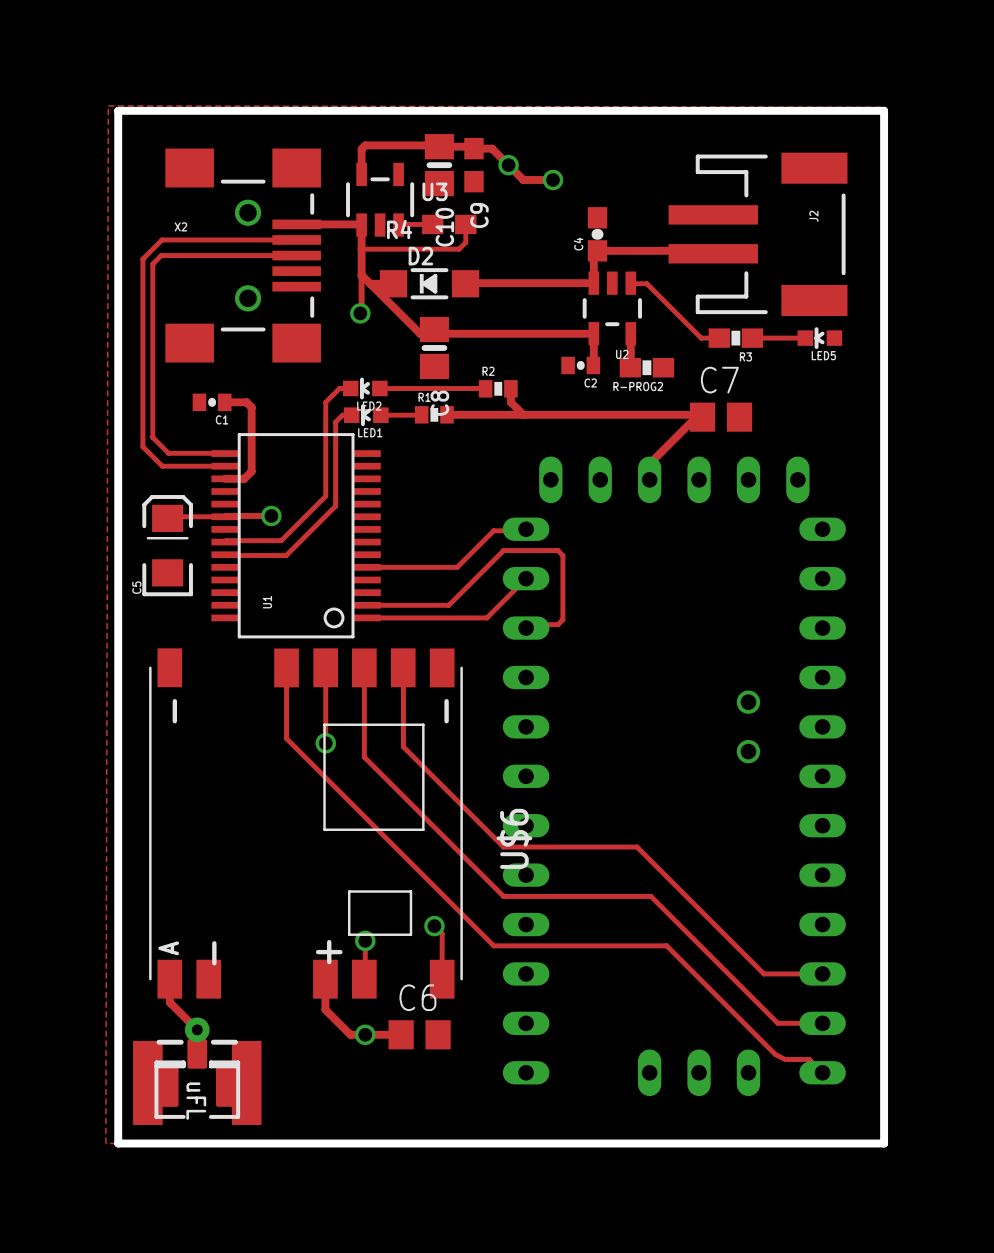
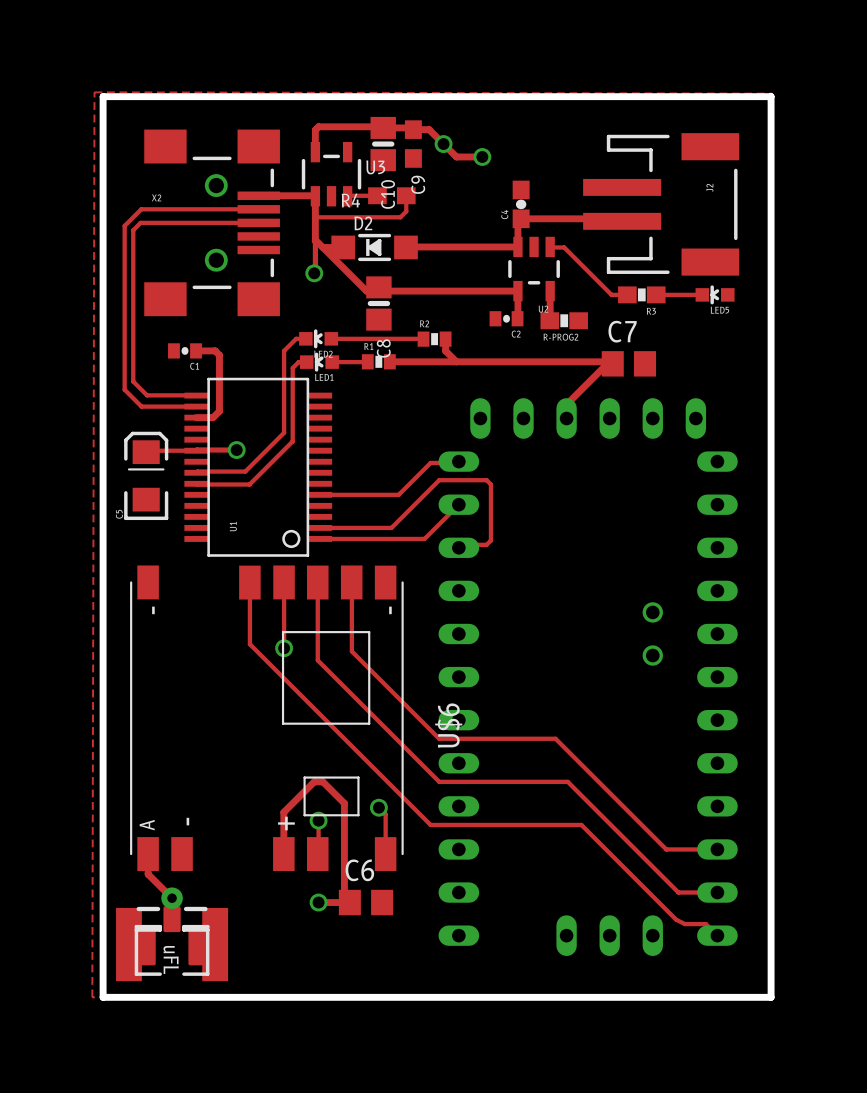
track: (325, 979) (325, 1009) (350, 1034) (365, 1034) -> (283, 854) (283, 812) (314, 781) (322, 781) (344, 803) (344, 897)

